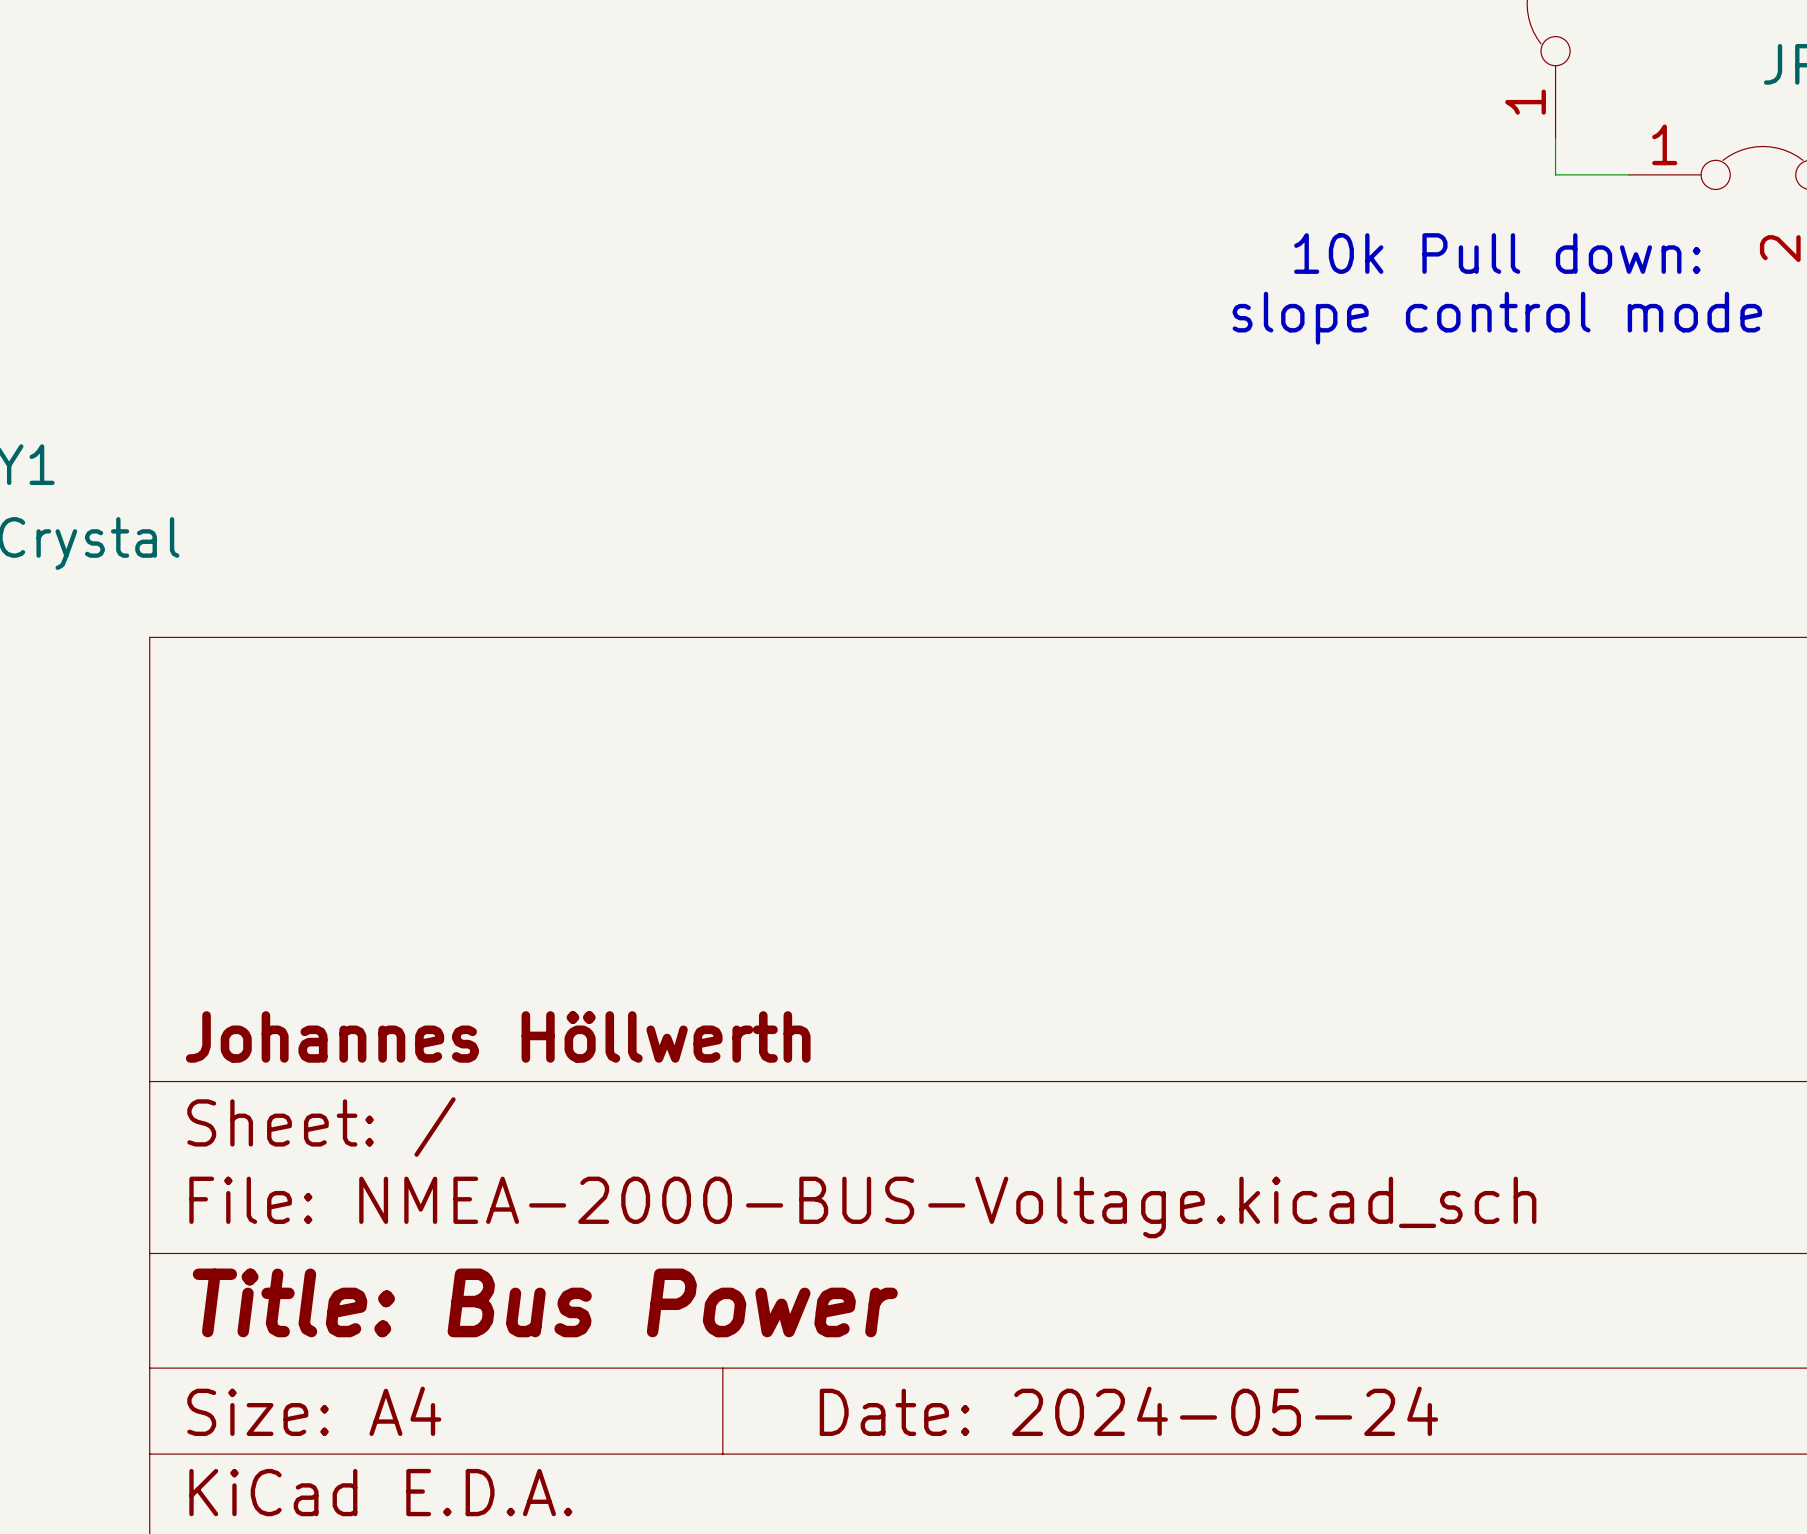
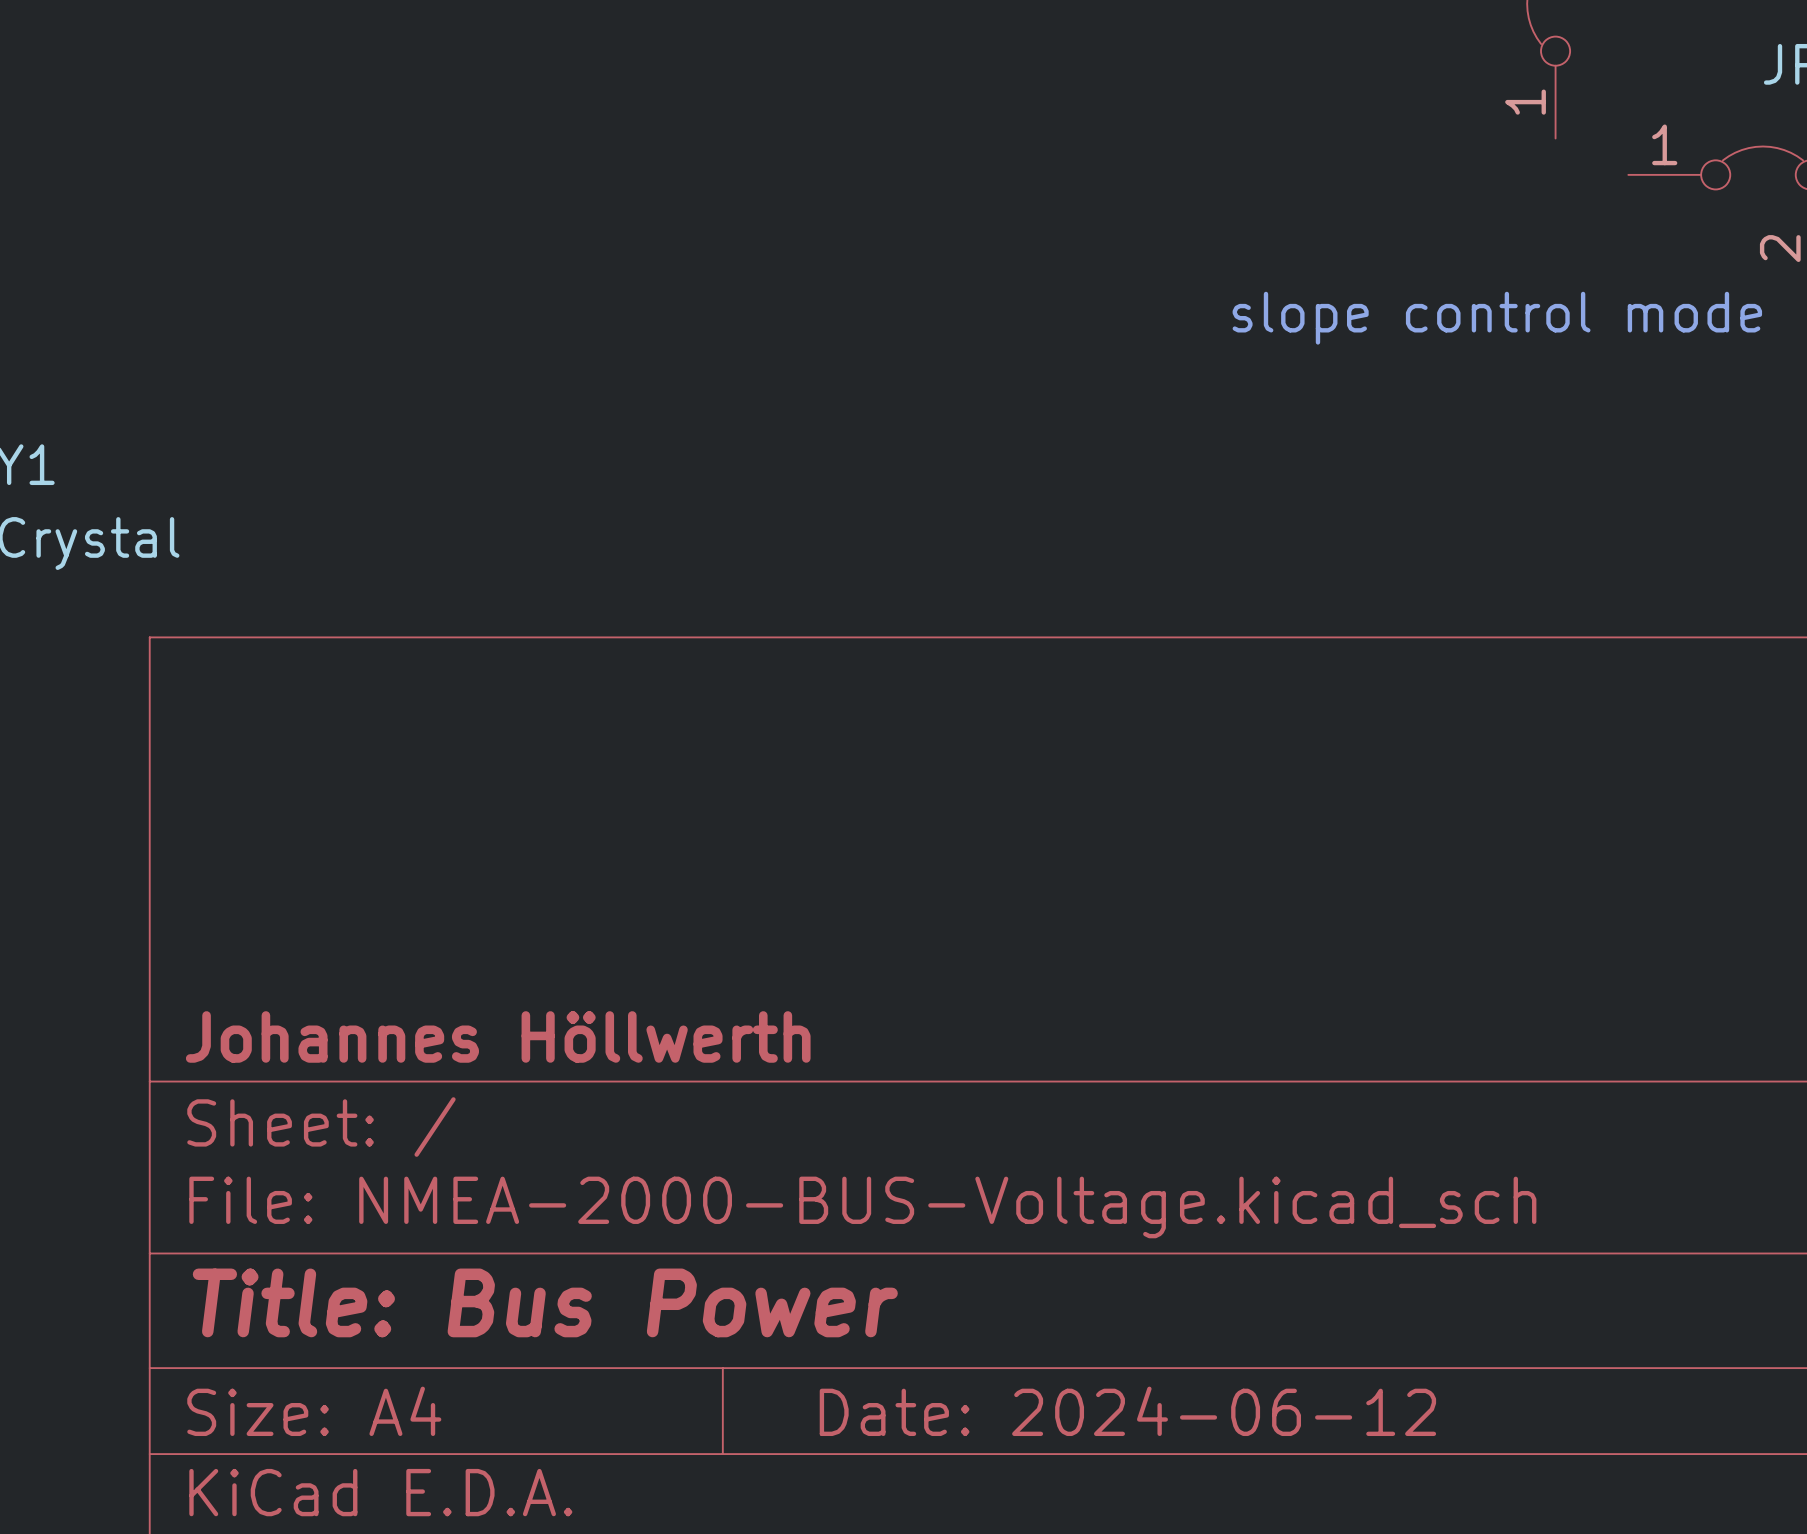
wire: (1555, 138) (1555, 174) (1628, 174) -> none
text: 10k Pull down: (1497, 253) -> none
title block: Date: 2024-05-24 (1128, 1411) -> Date: 2024-06-12 (1127, 1411)

